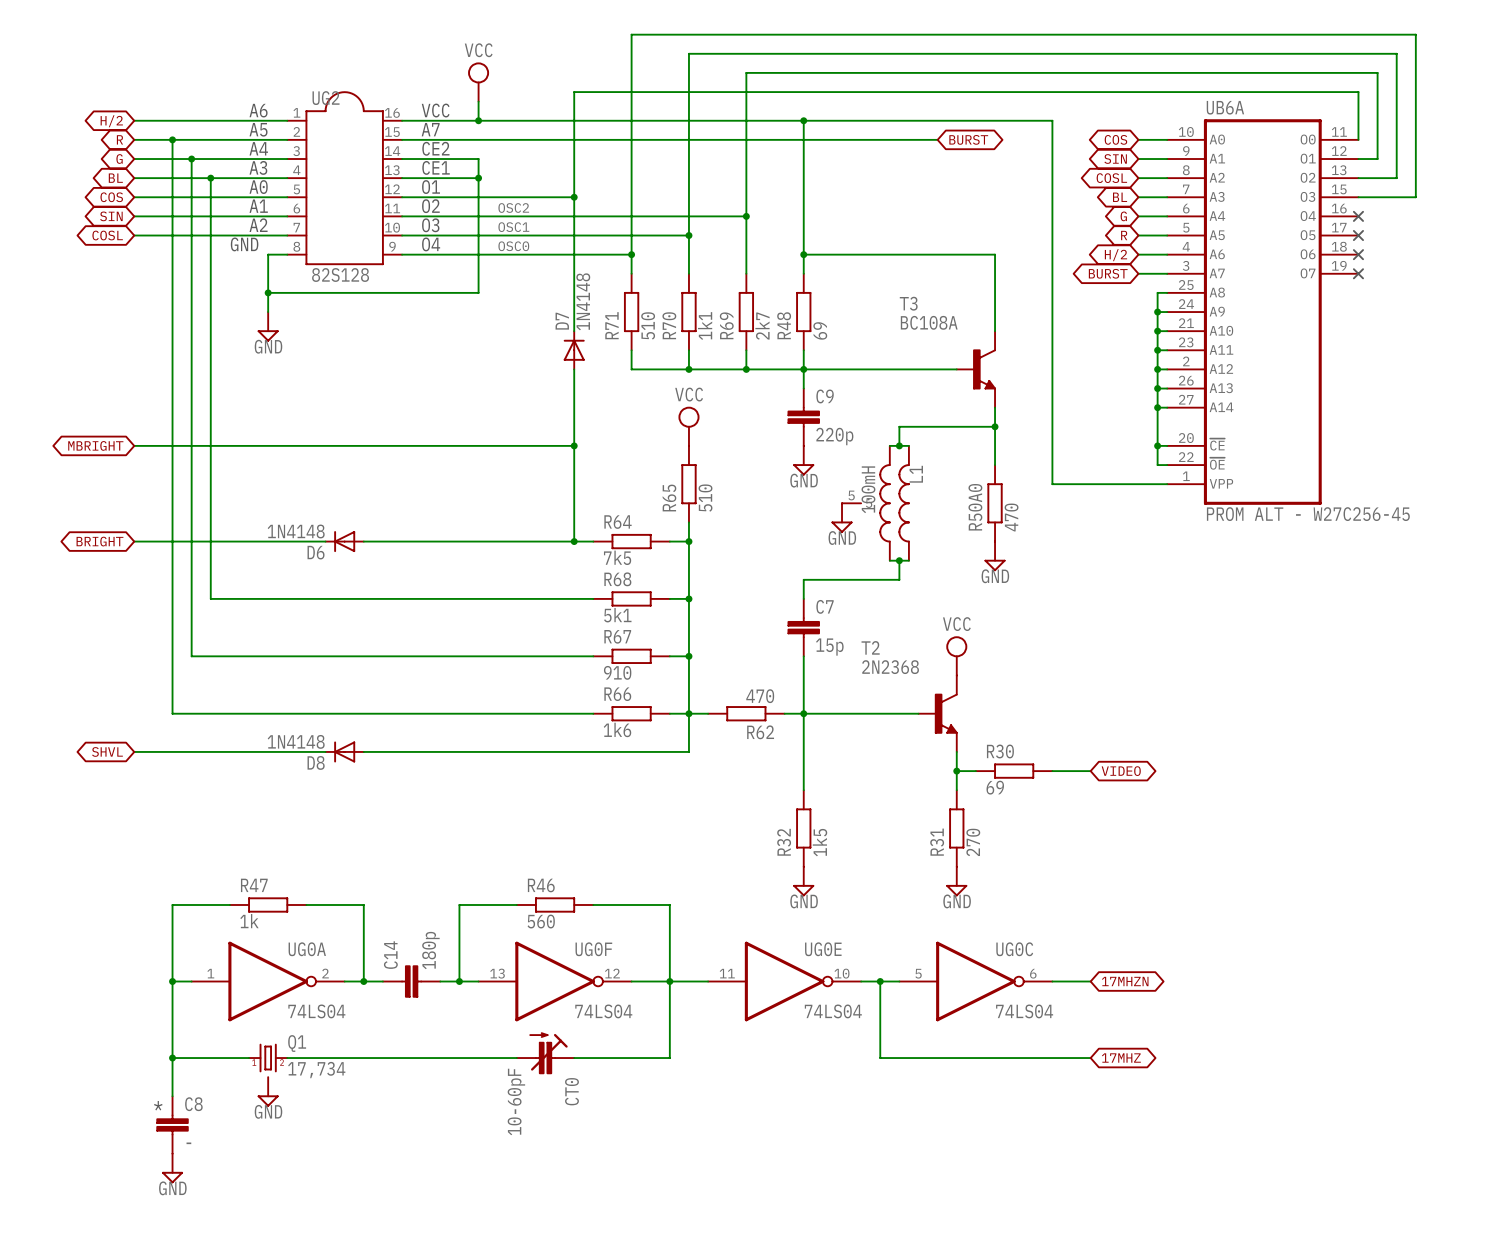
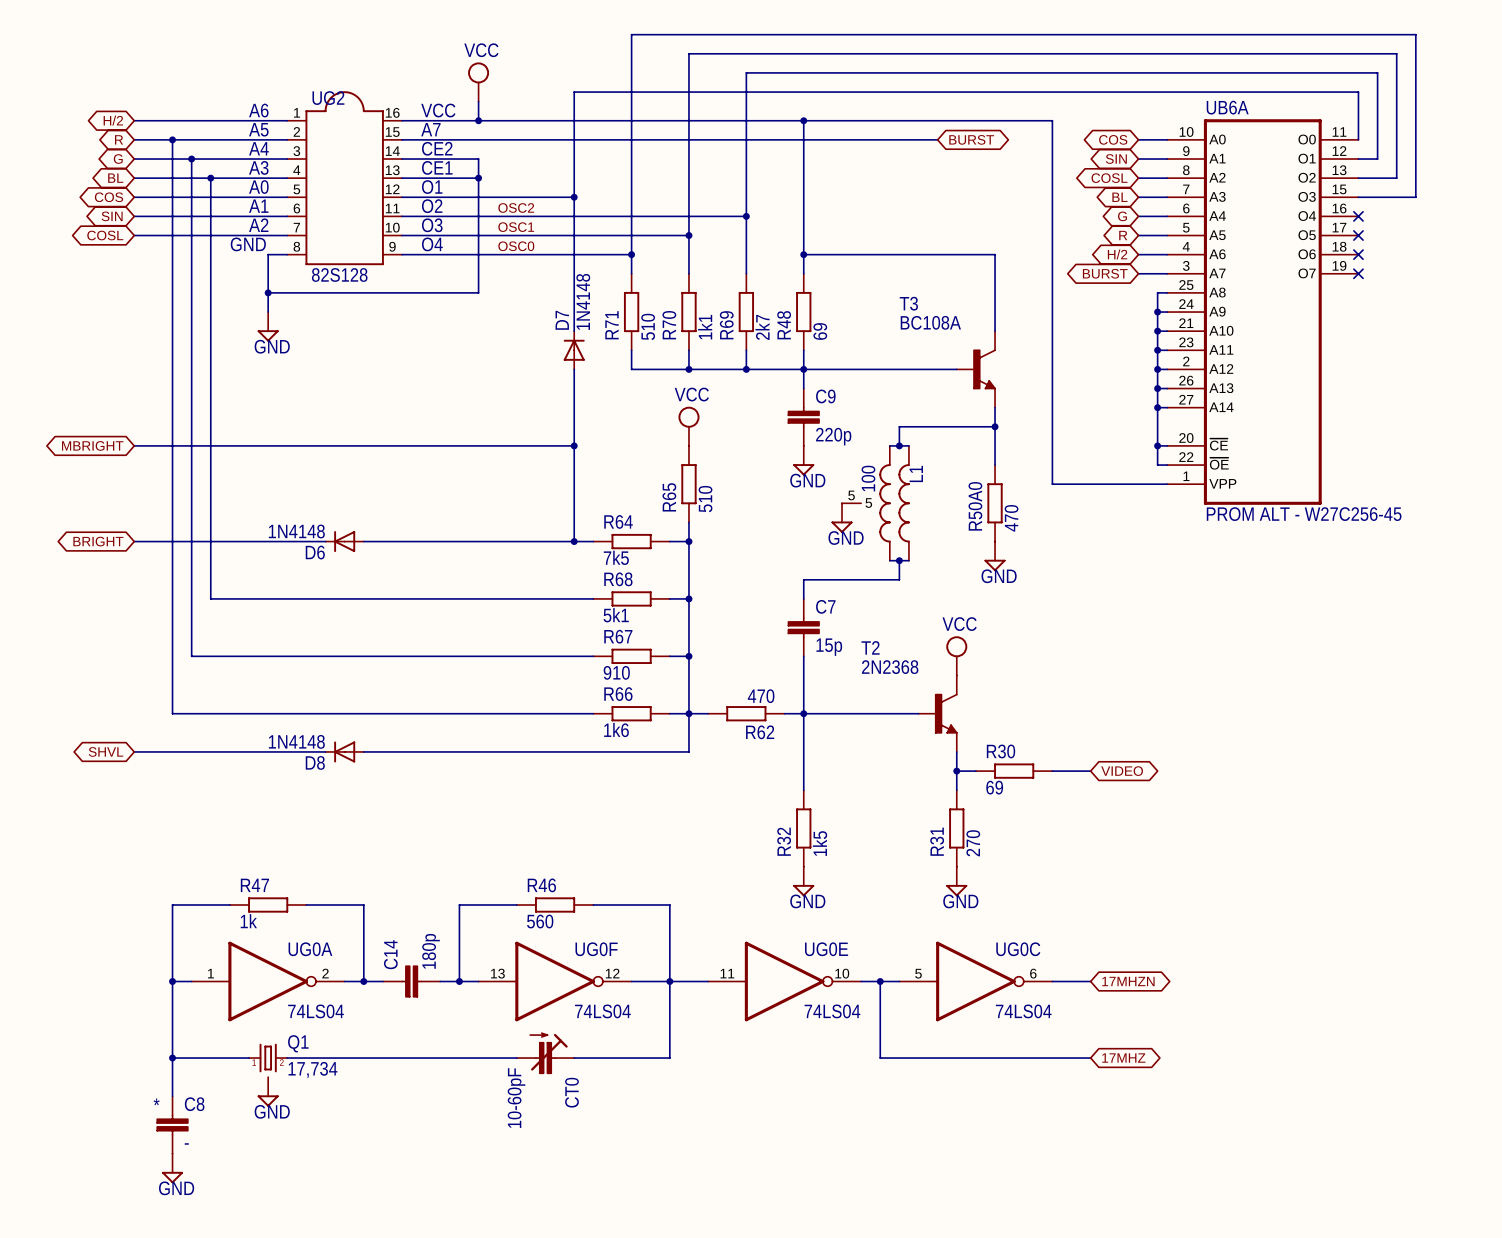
L1 value: 100mH (868, 489) -> 100 (868, 478)

